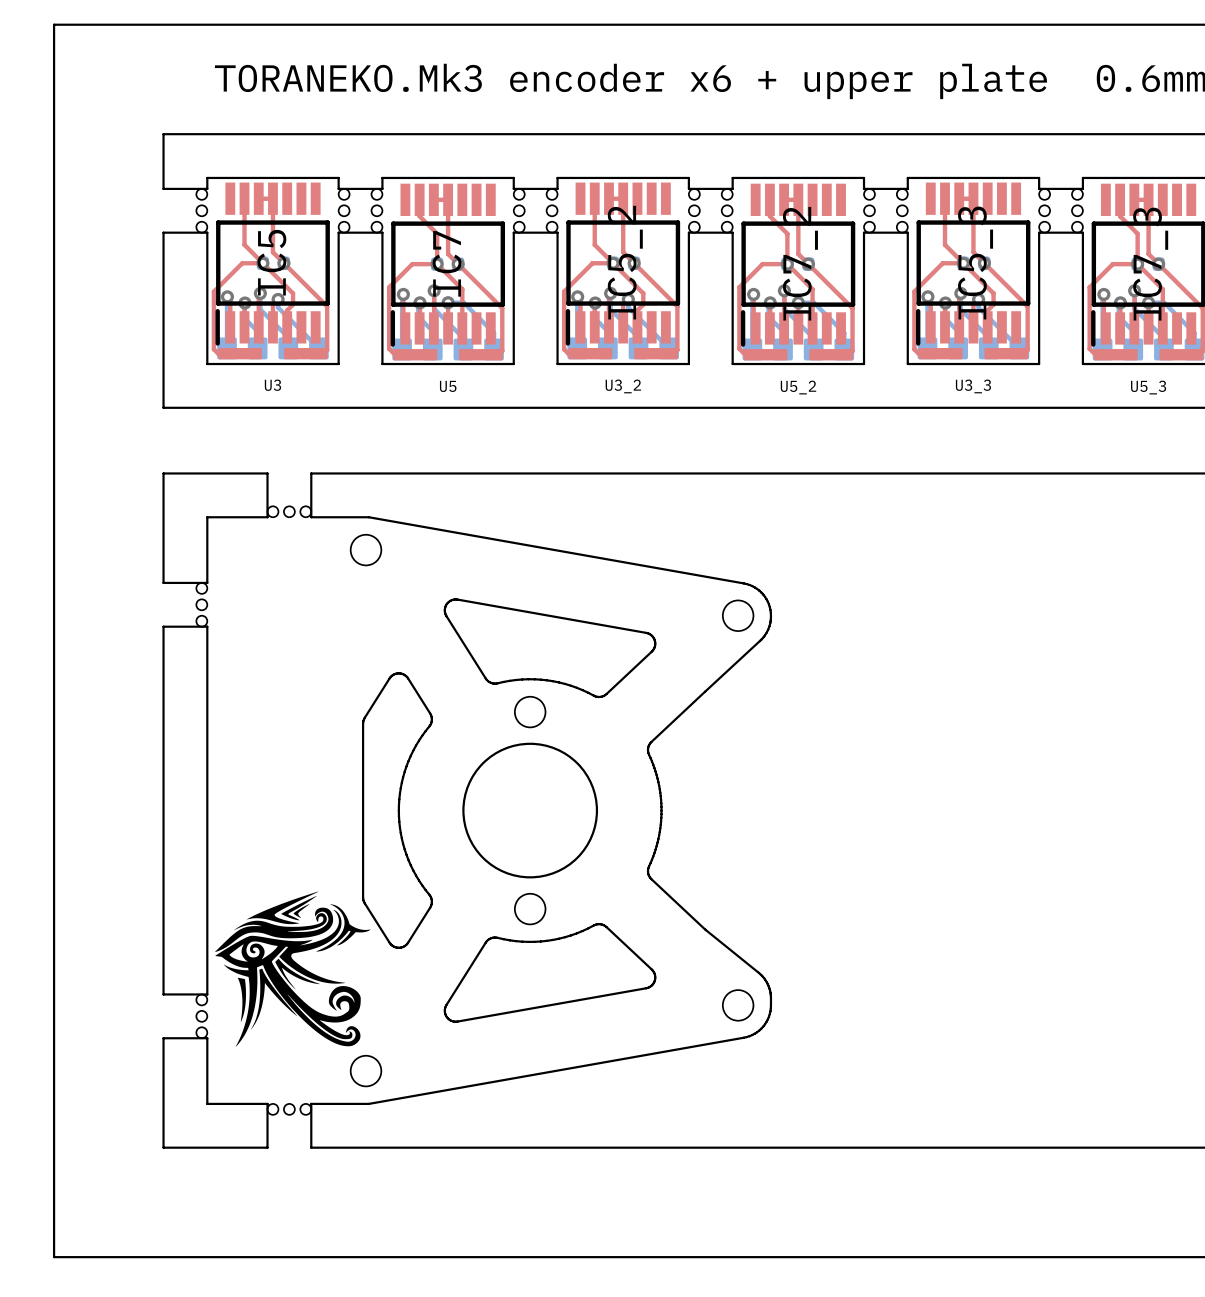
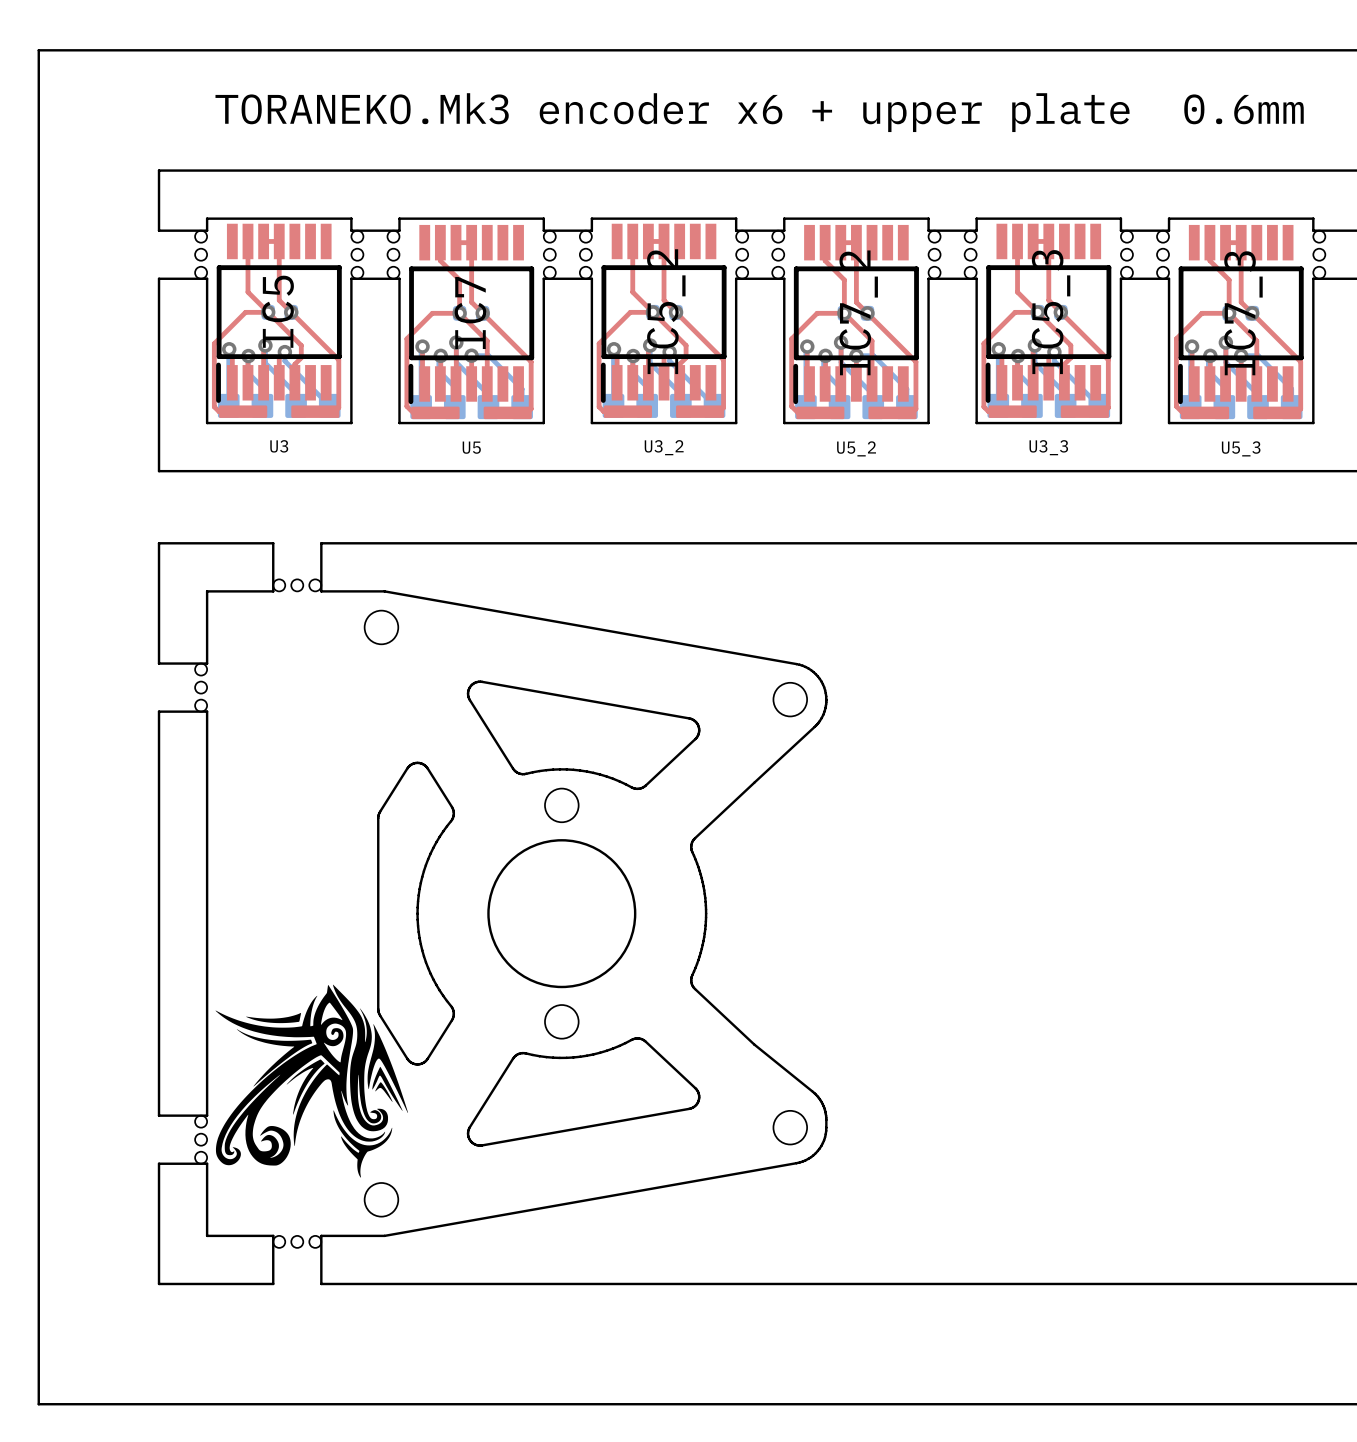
drawing shape: [215, 891, 371, 1047] -> [215, 984, 409, 1178]

